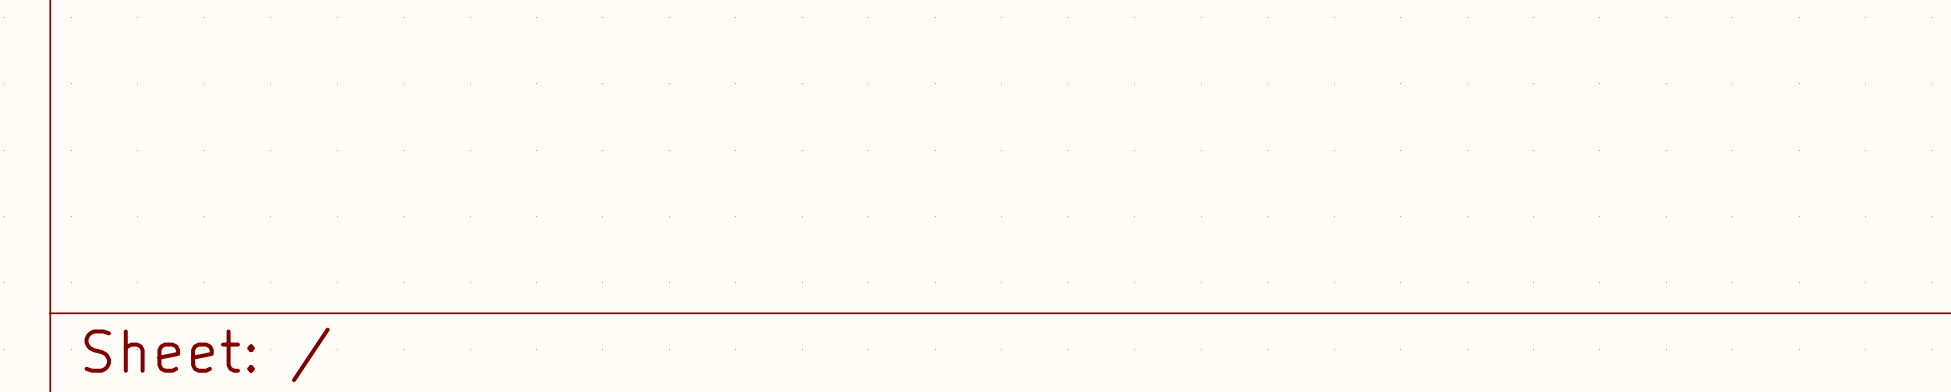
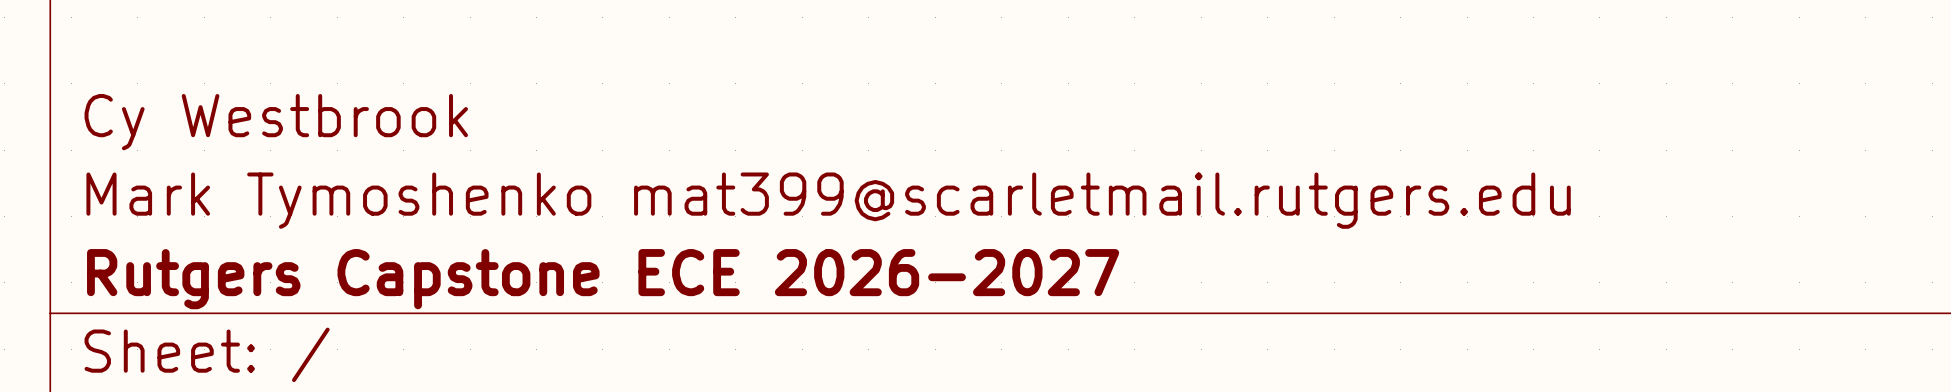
title block: none -> Cy Westbrook (276, 122)
title block: none -> Mark Tymoshenko mat399@scarletmail.rutgers.edu (828, 200)
title block: none -> Rutgers Capstone ECE 2026-2027 (603, 279)

